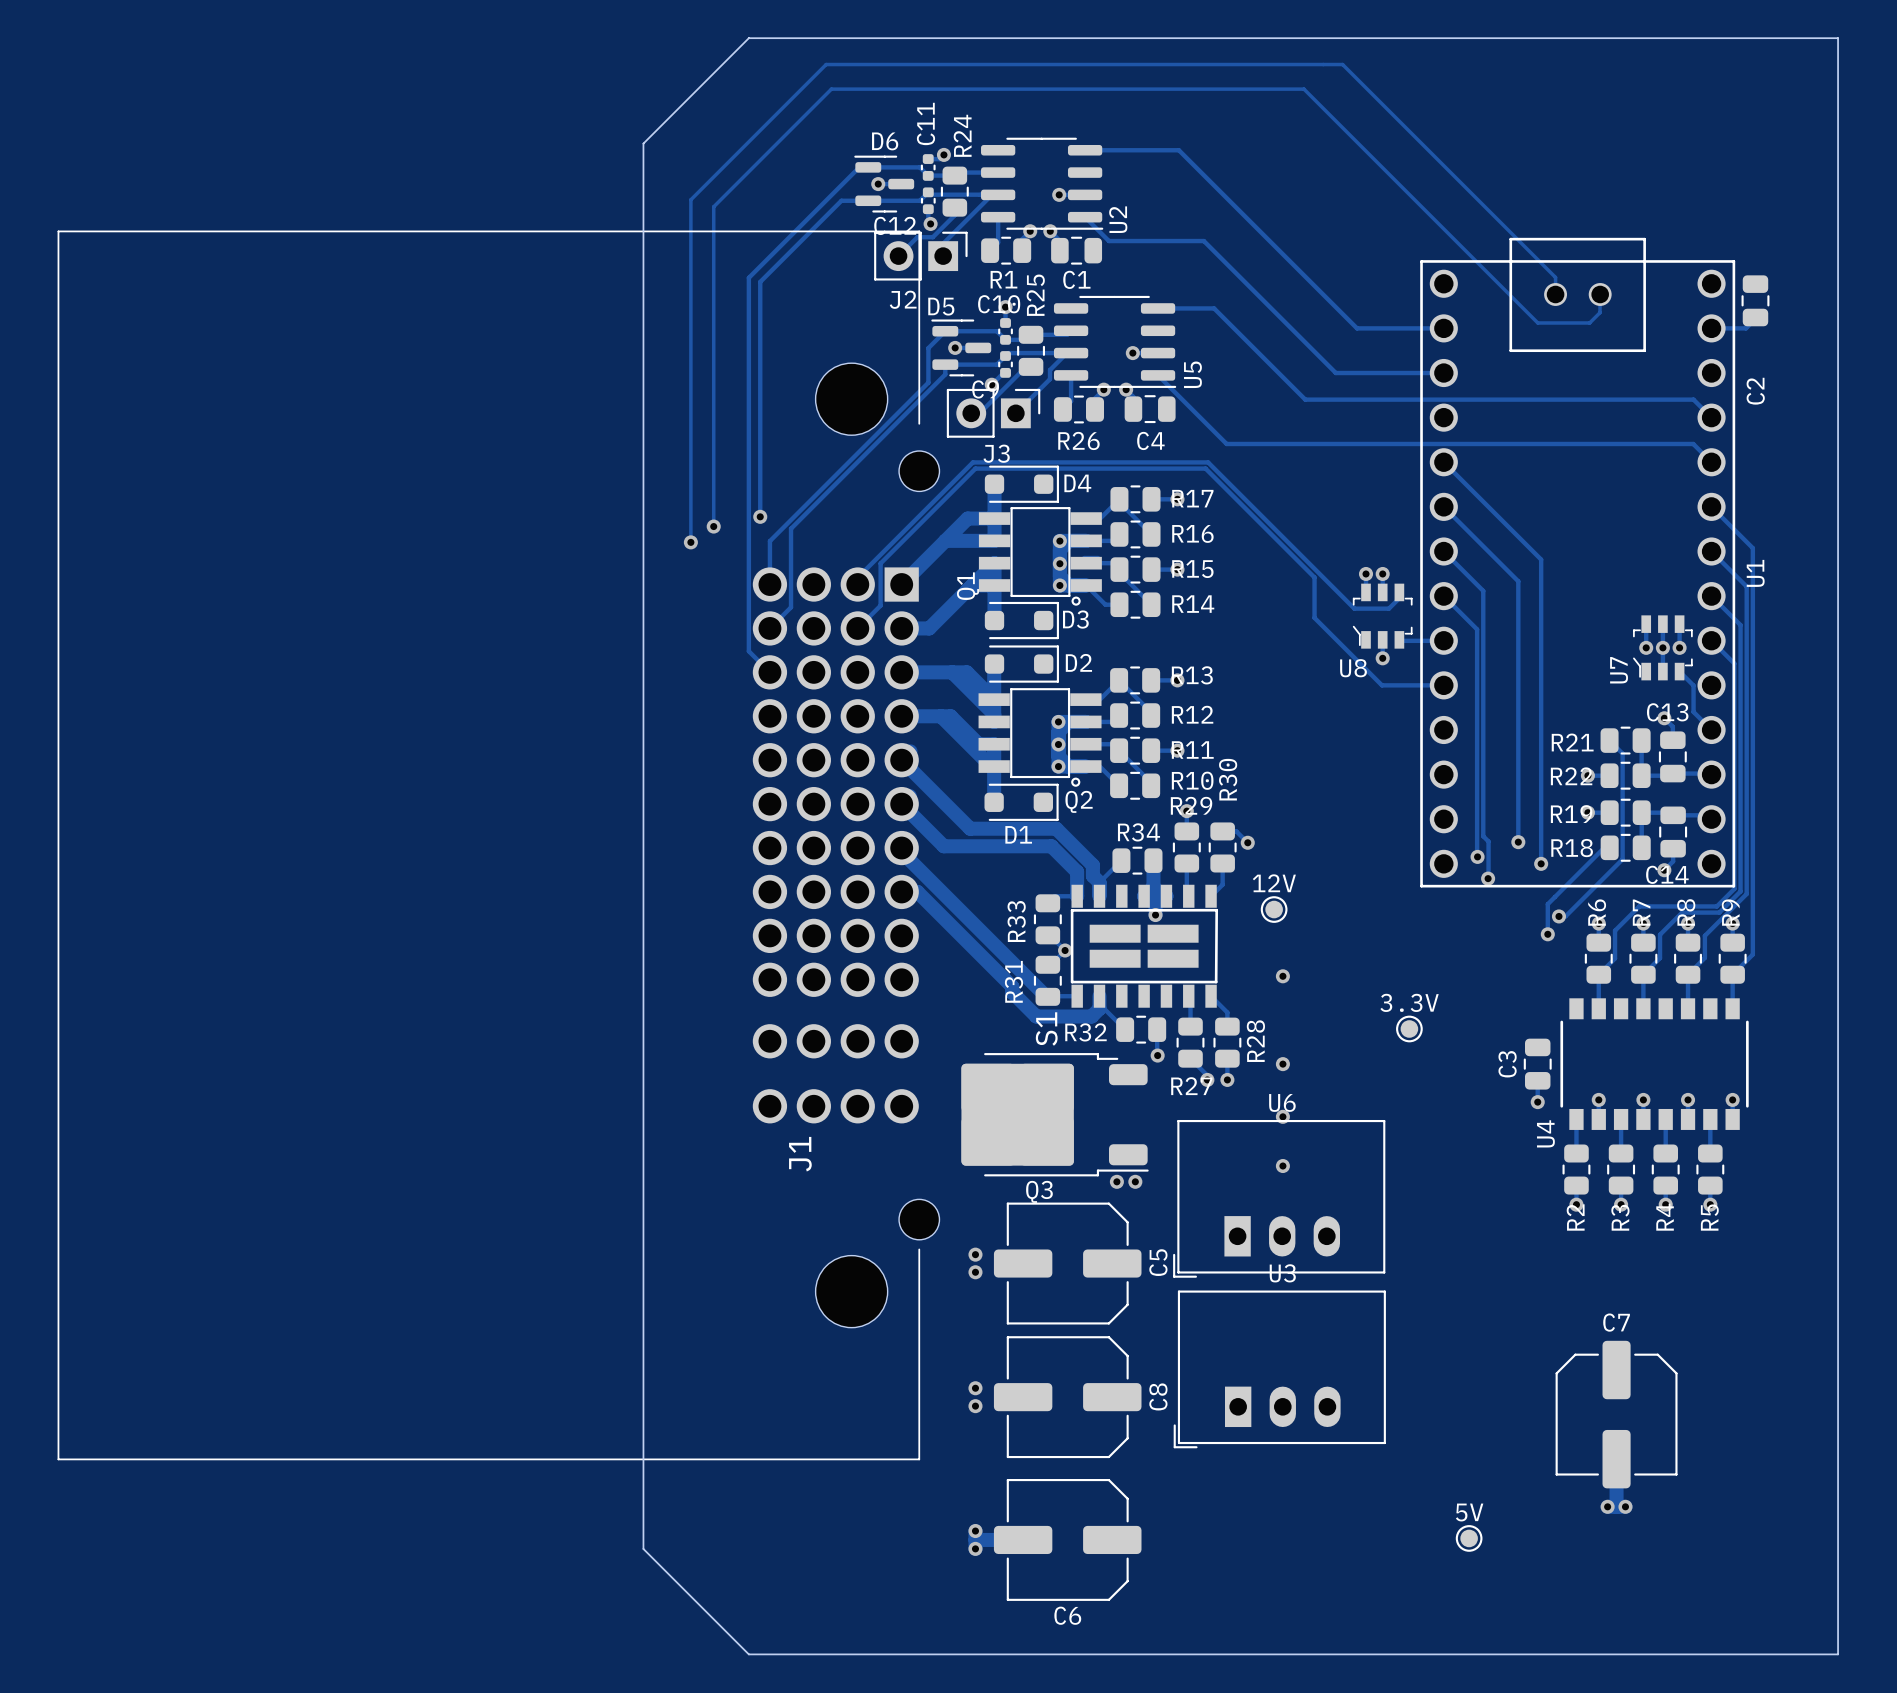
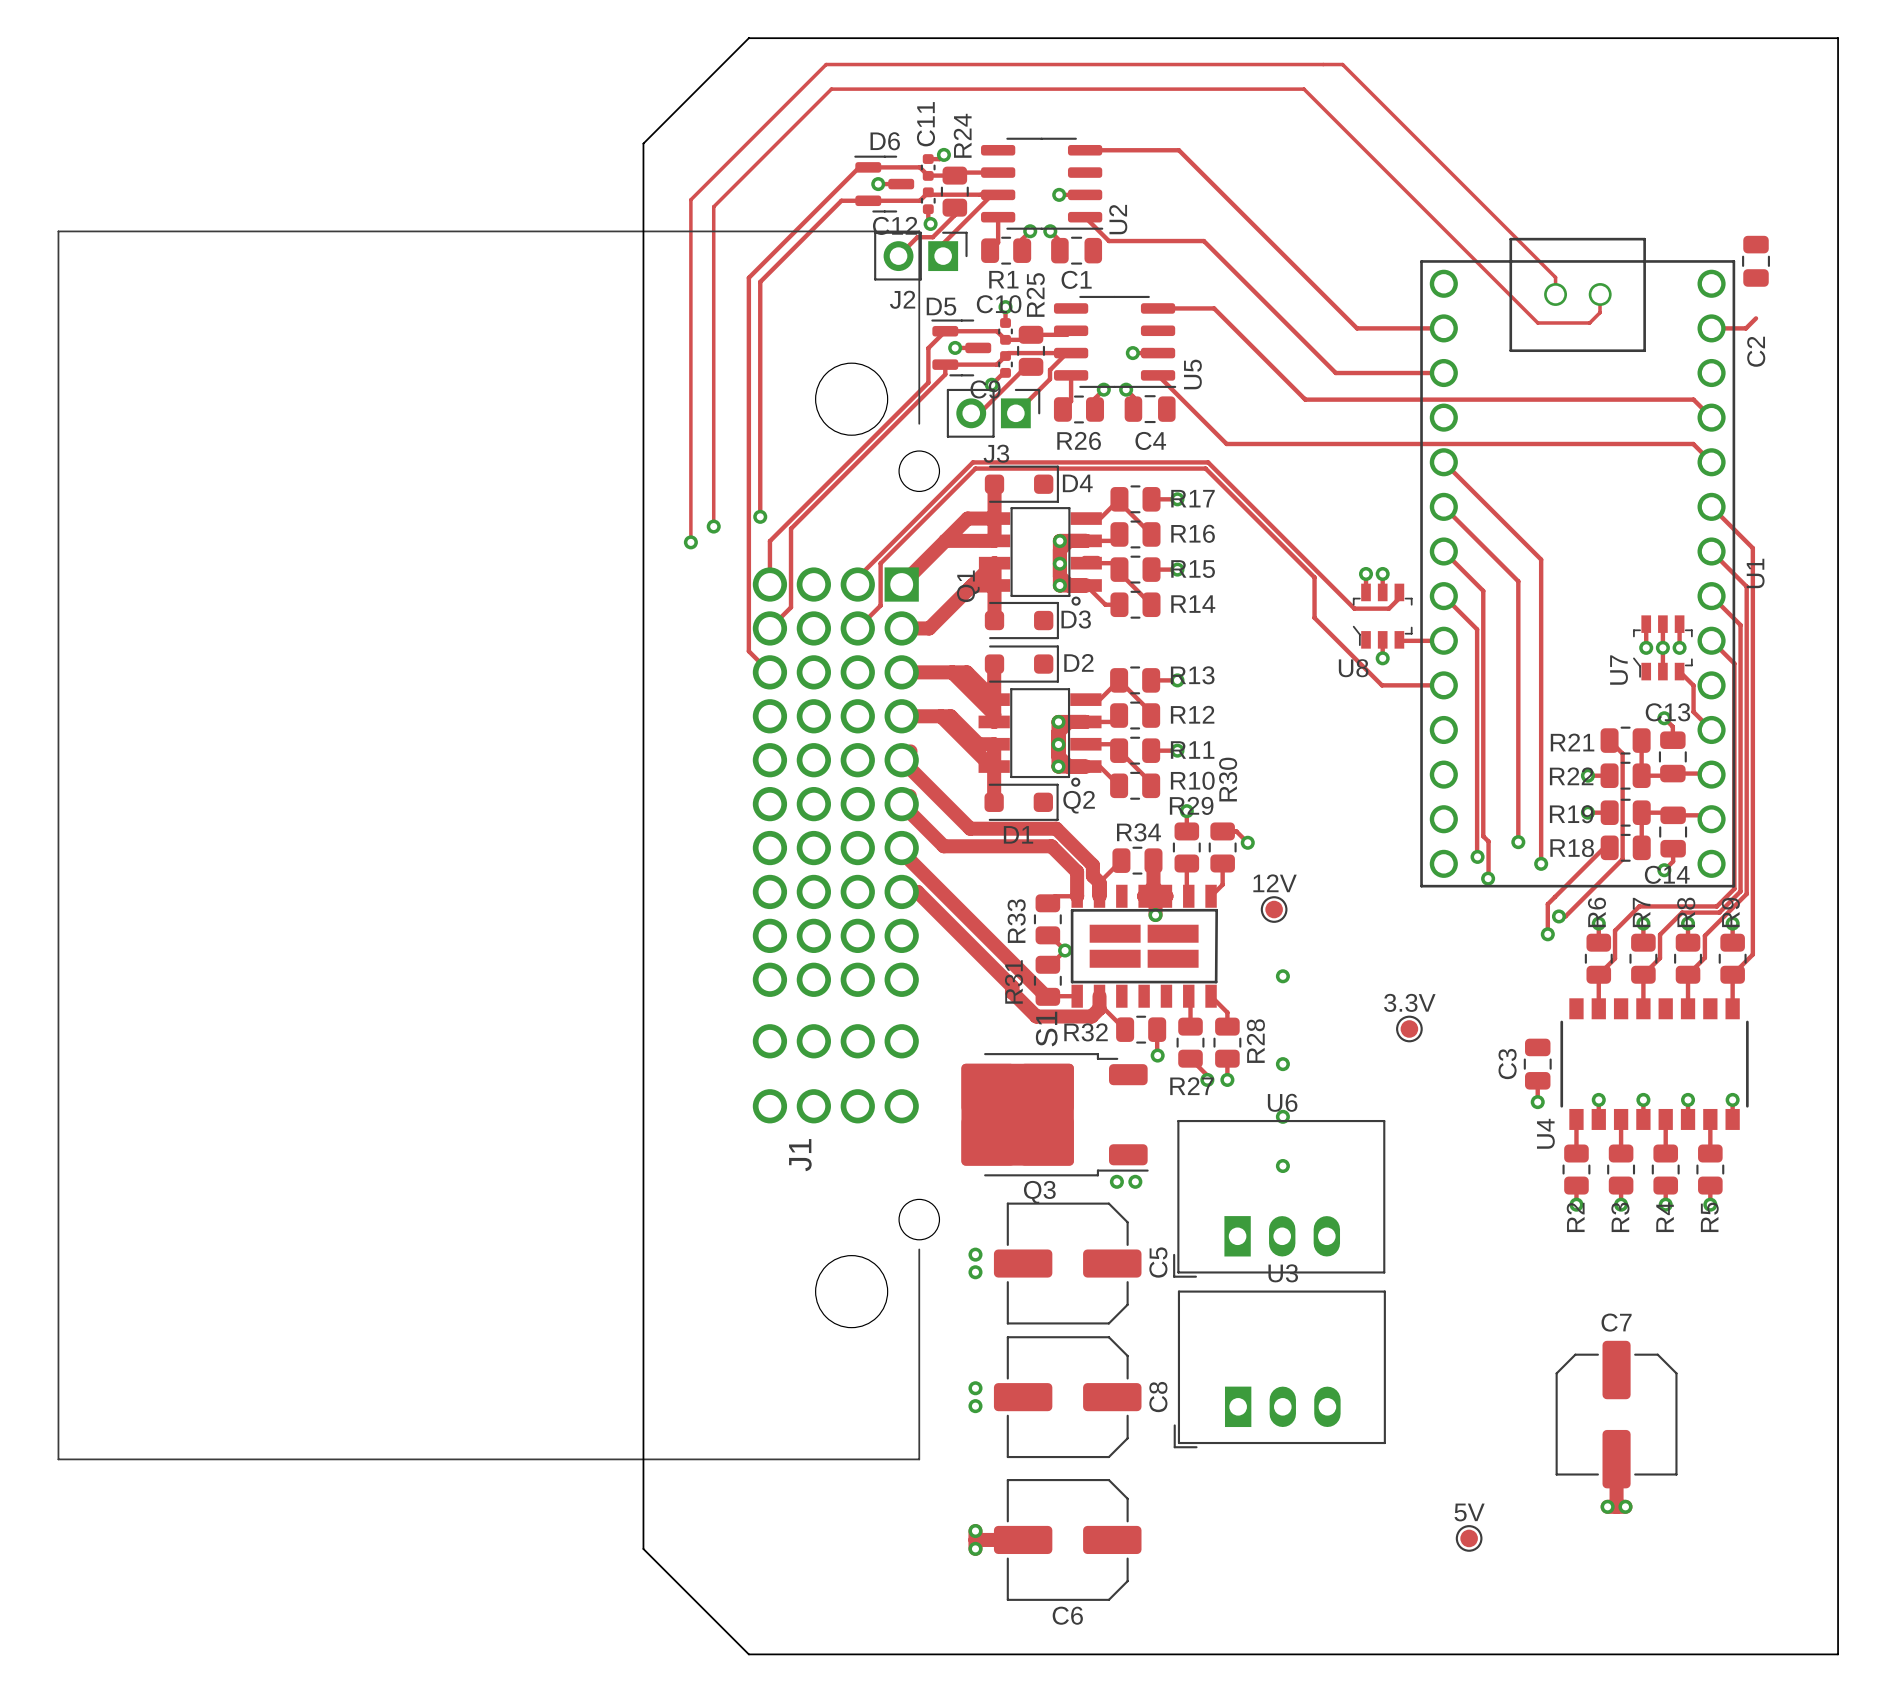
C2 position: (1755, 300) -> (1756, 261)

